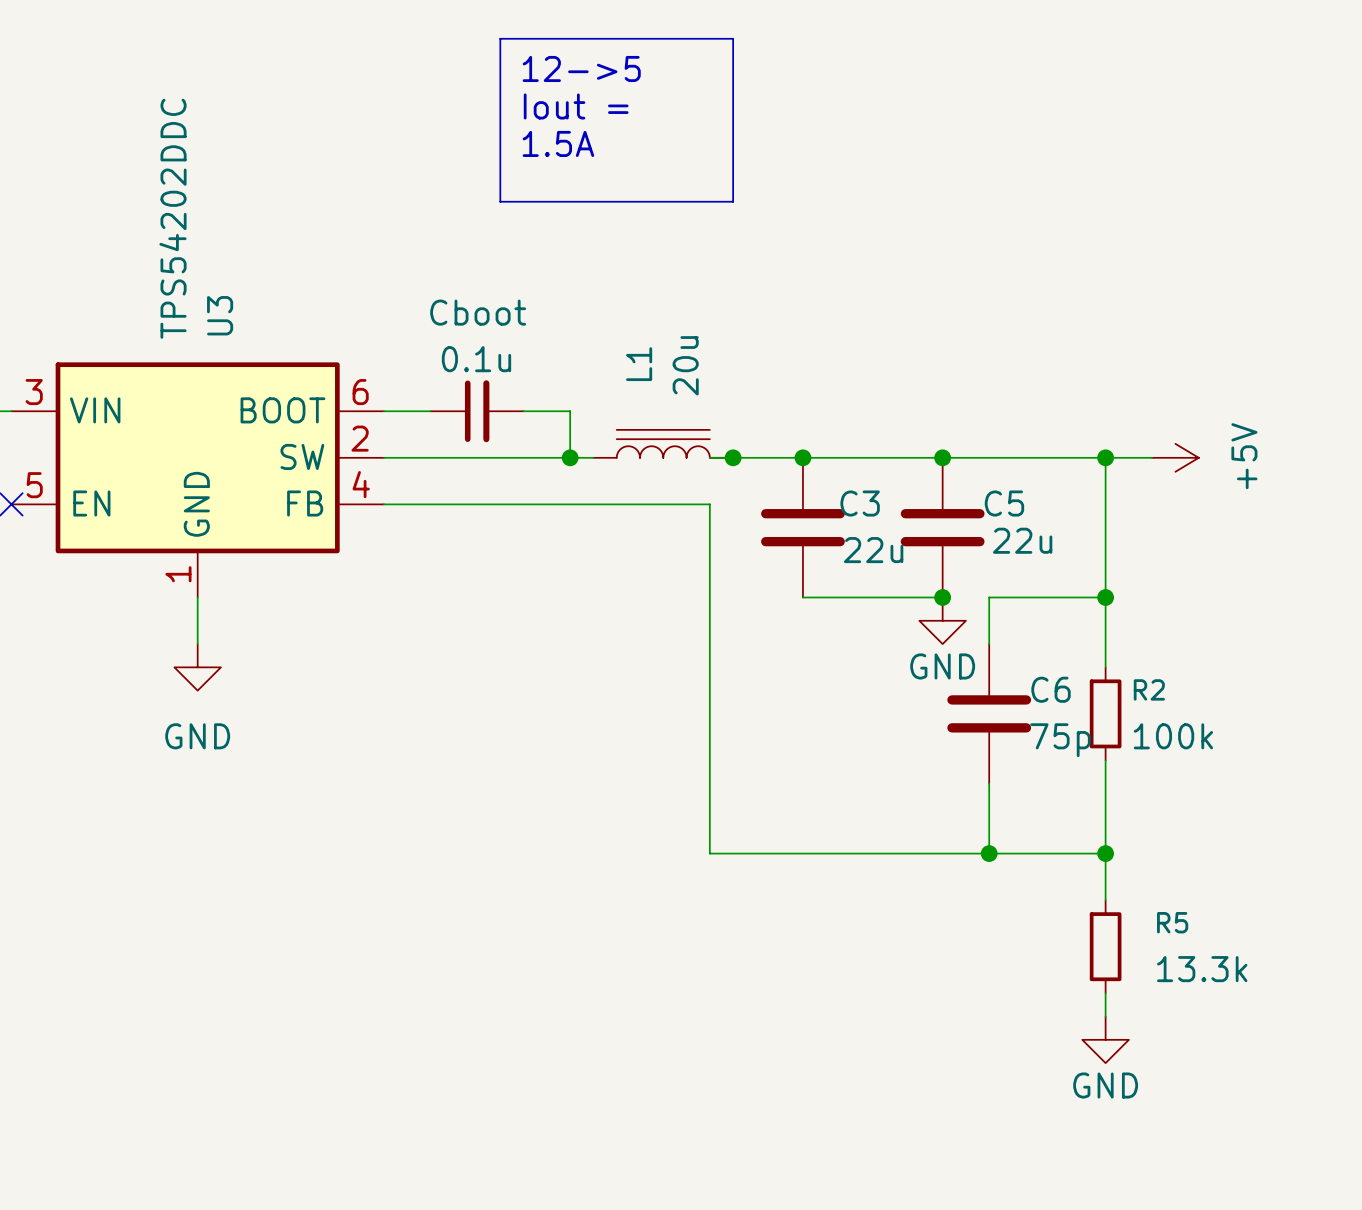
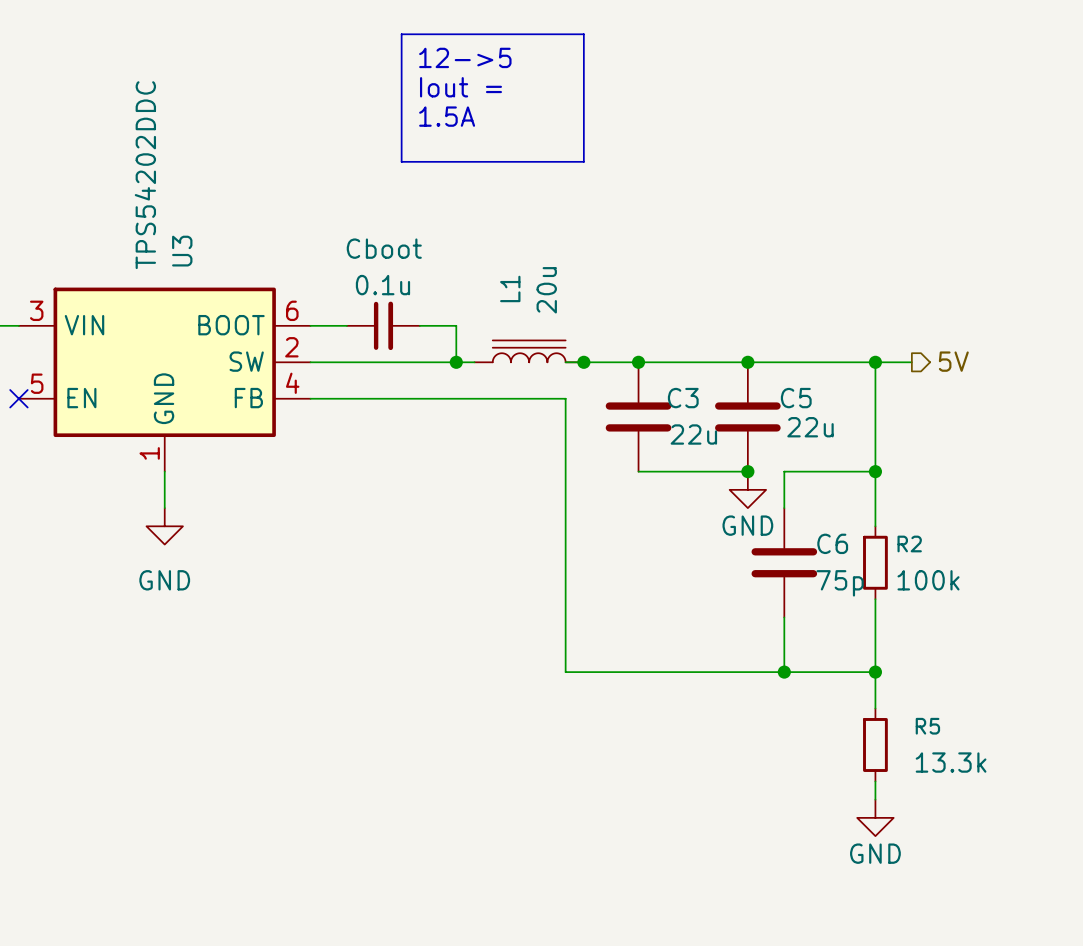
hierarchical label: none -> 5V (953, 361)
power symbol: +5V (1175, 457) -> none

